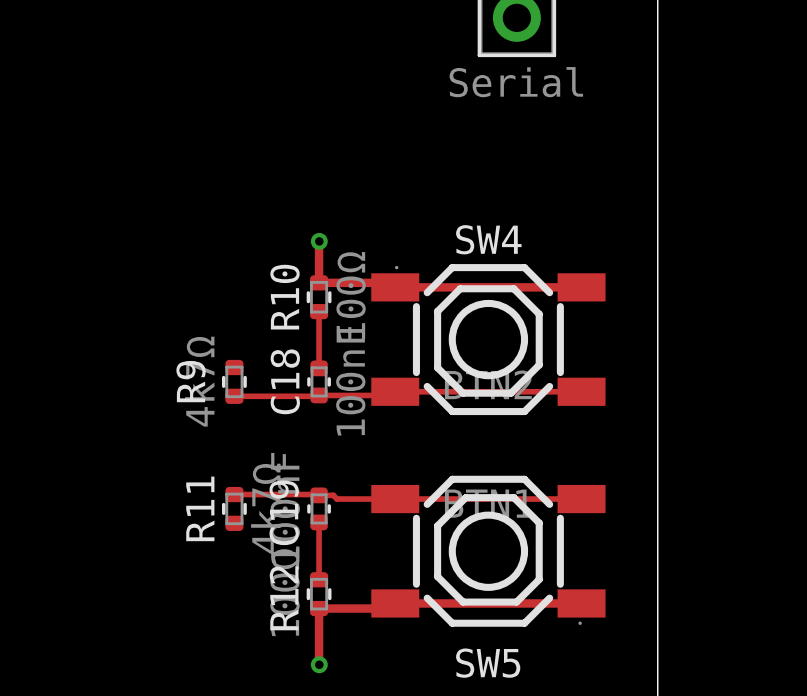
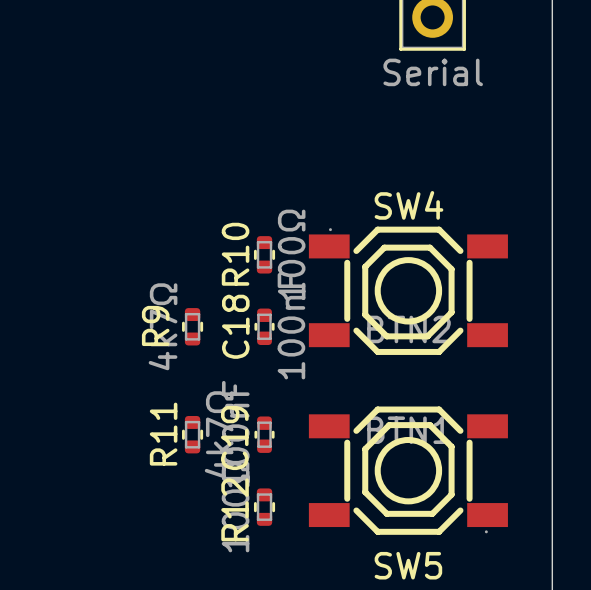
track: (319, 241) (319, 282) (390, 282) (395, 287) (581, 287) -> none
via: (319, 241) -> none
track: (319, 311) (319, 368) -> none
track: (581, 391) (395, 391) (391, 395) (234, 396) -> none
track: (234, 494) (318, 494) (333, 495) (337, 499) (581, 499) -> none
track: (319, 522) (319, 579) -> none
track: (581, 603) (395, 603) (390, 608) (319, 608) (319, 664) -> none
via: (319, 664) -> none

